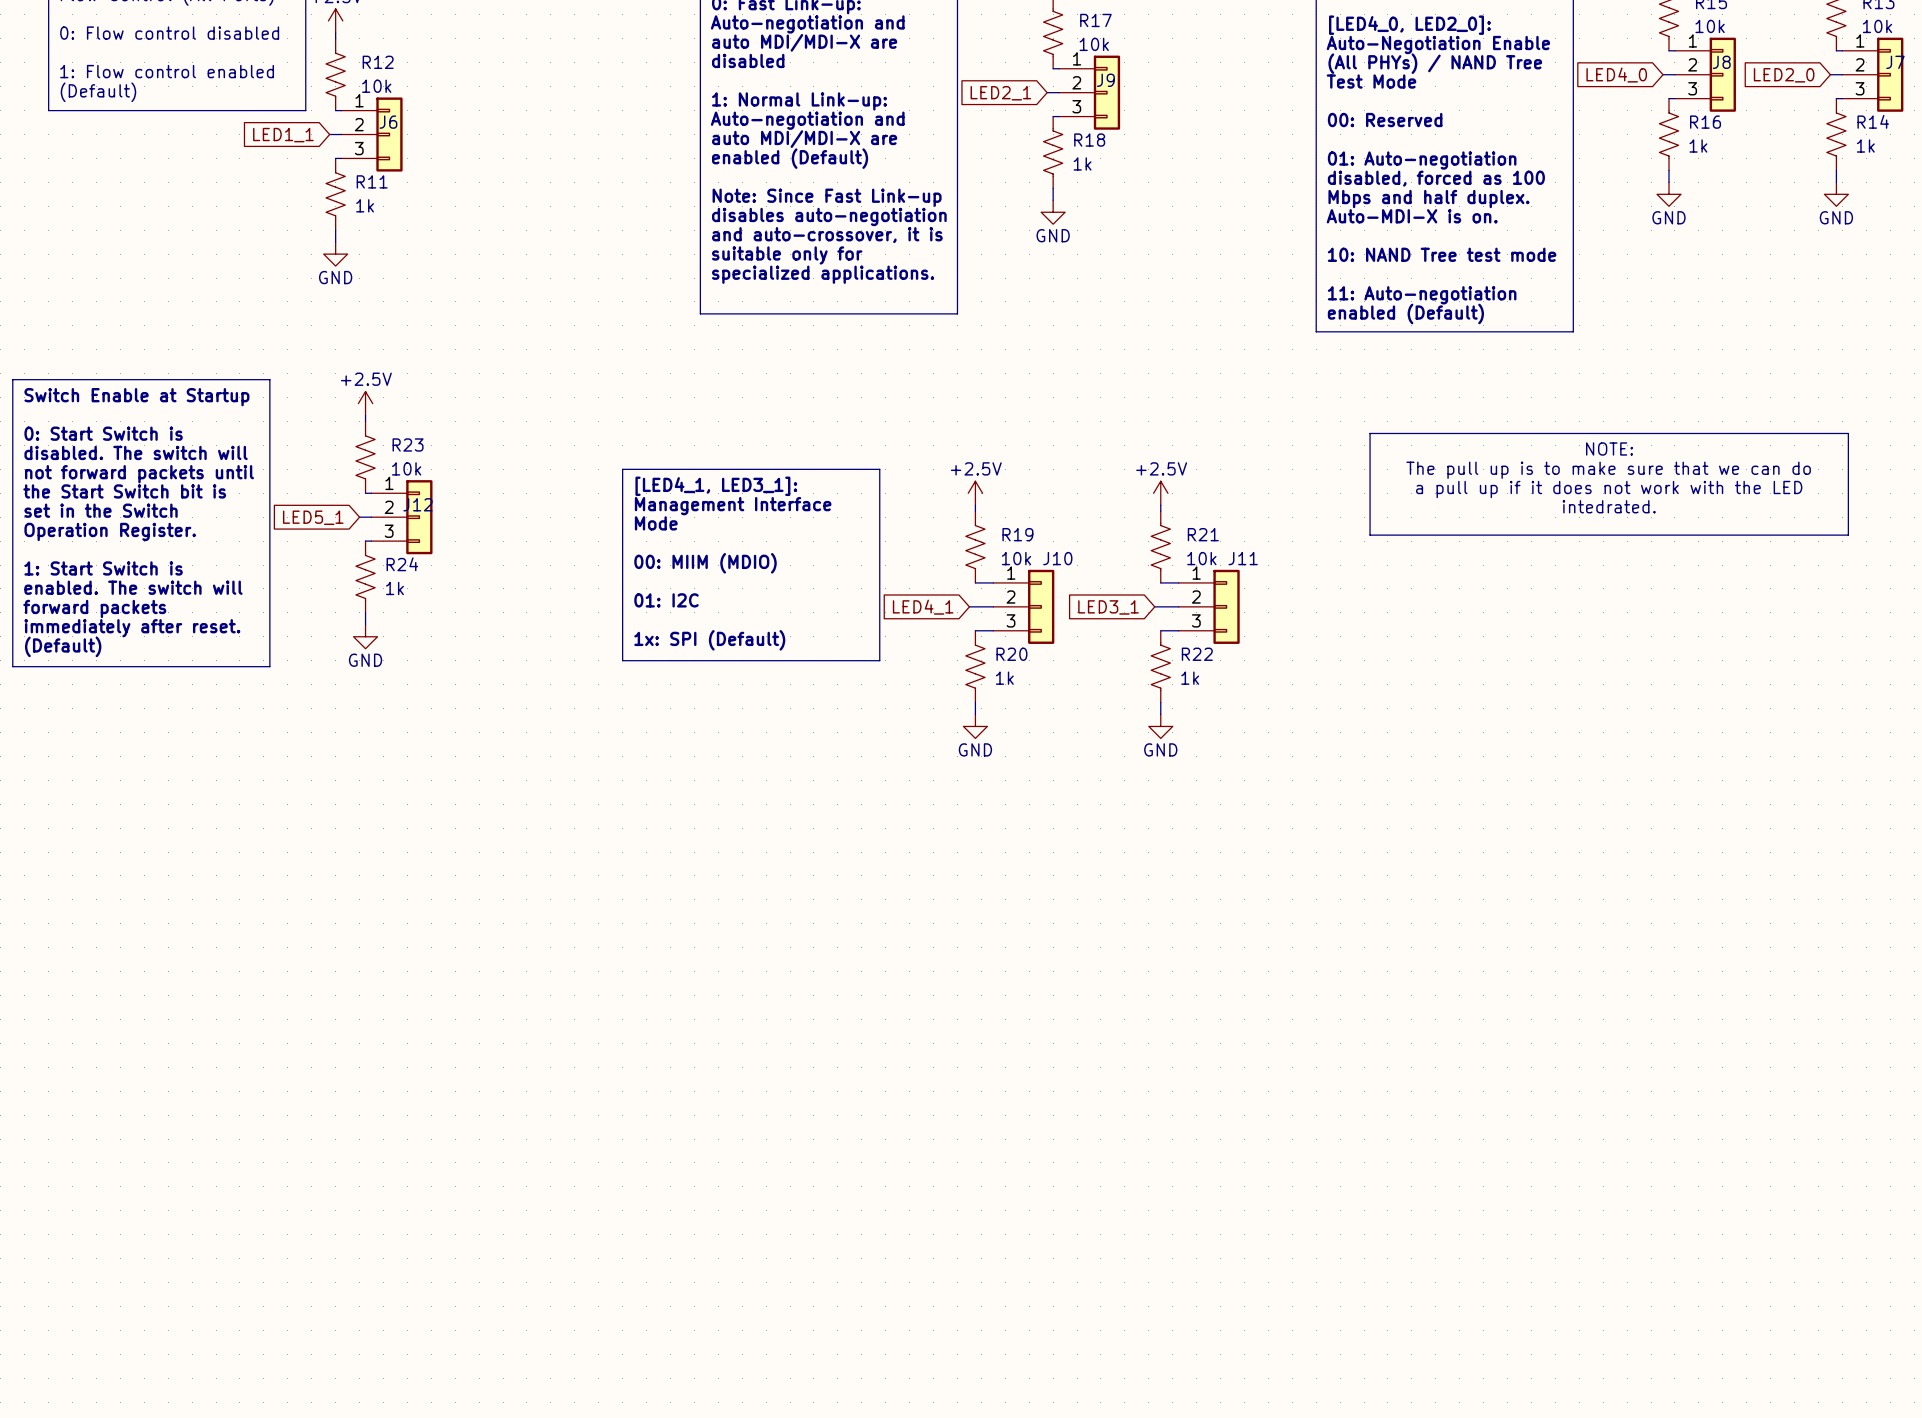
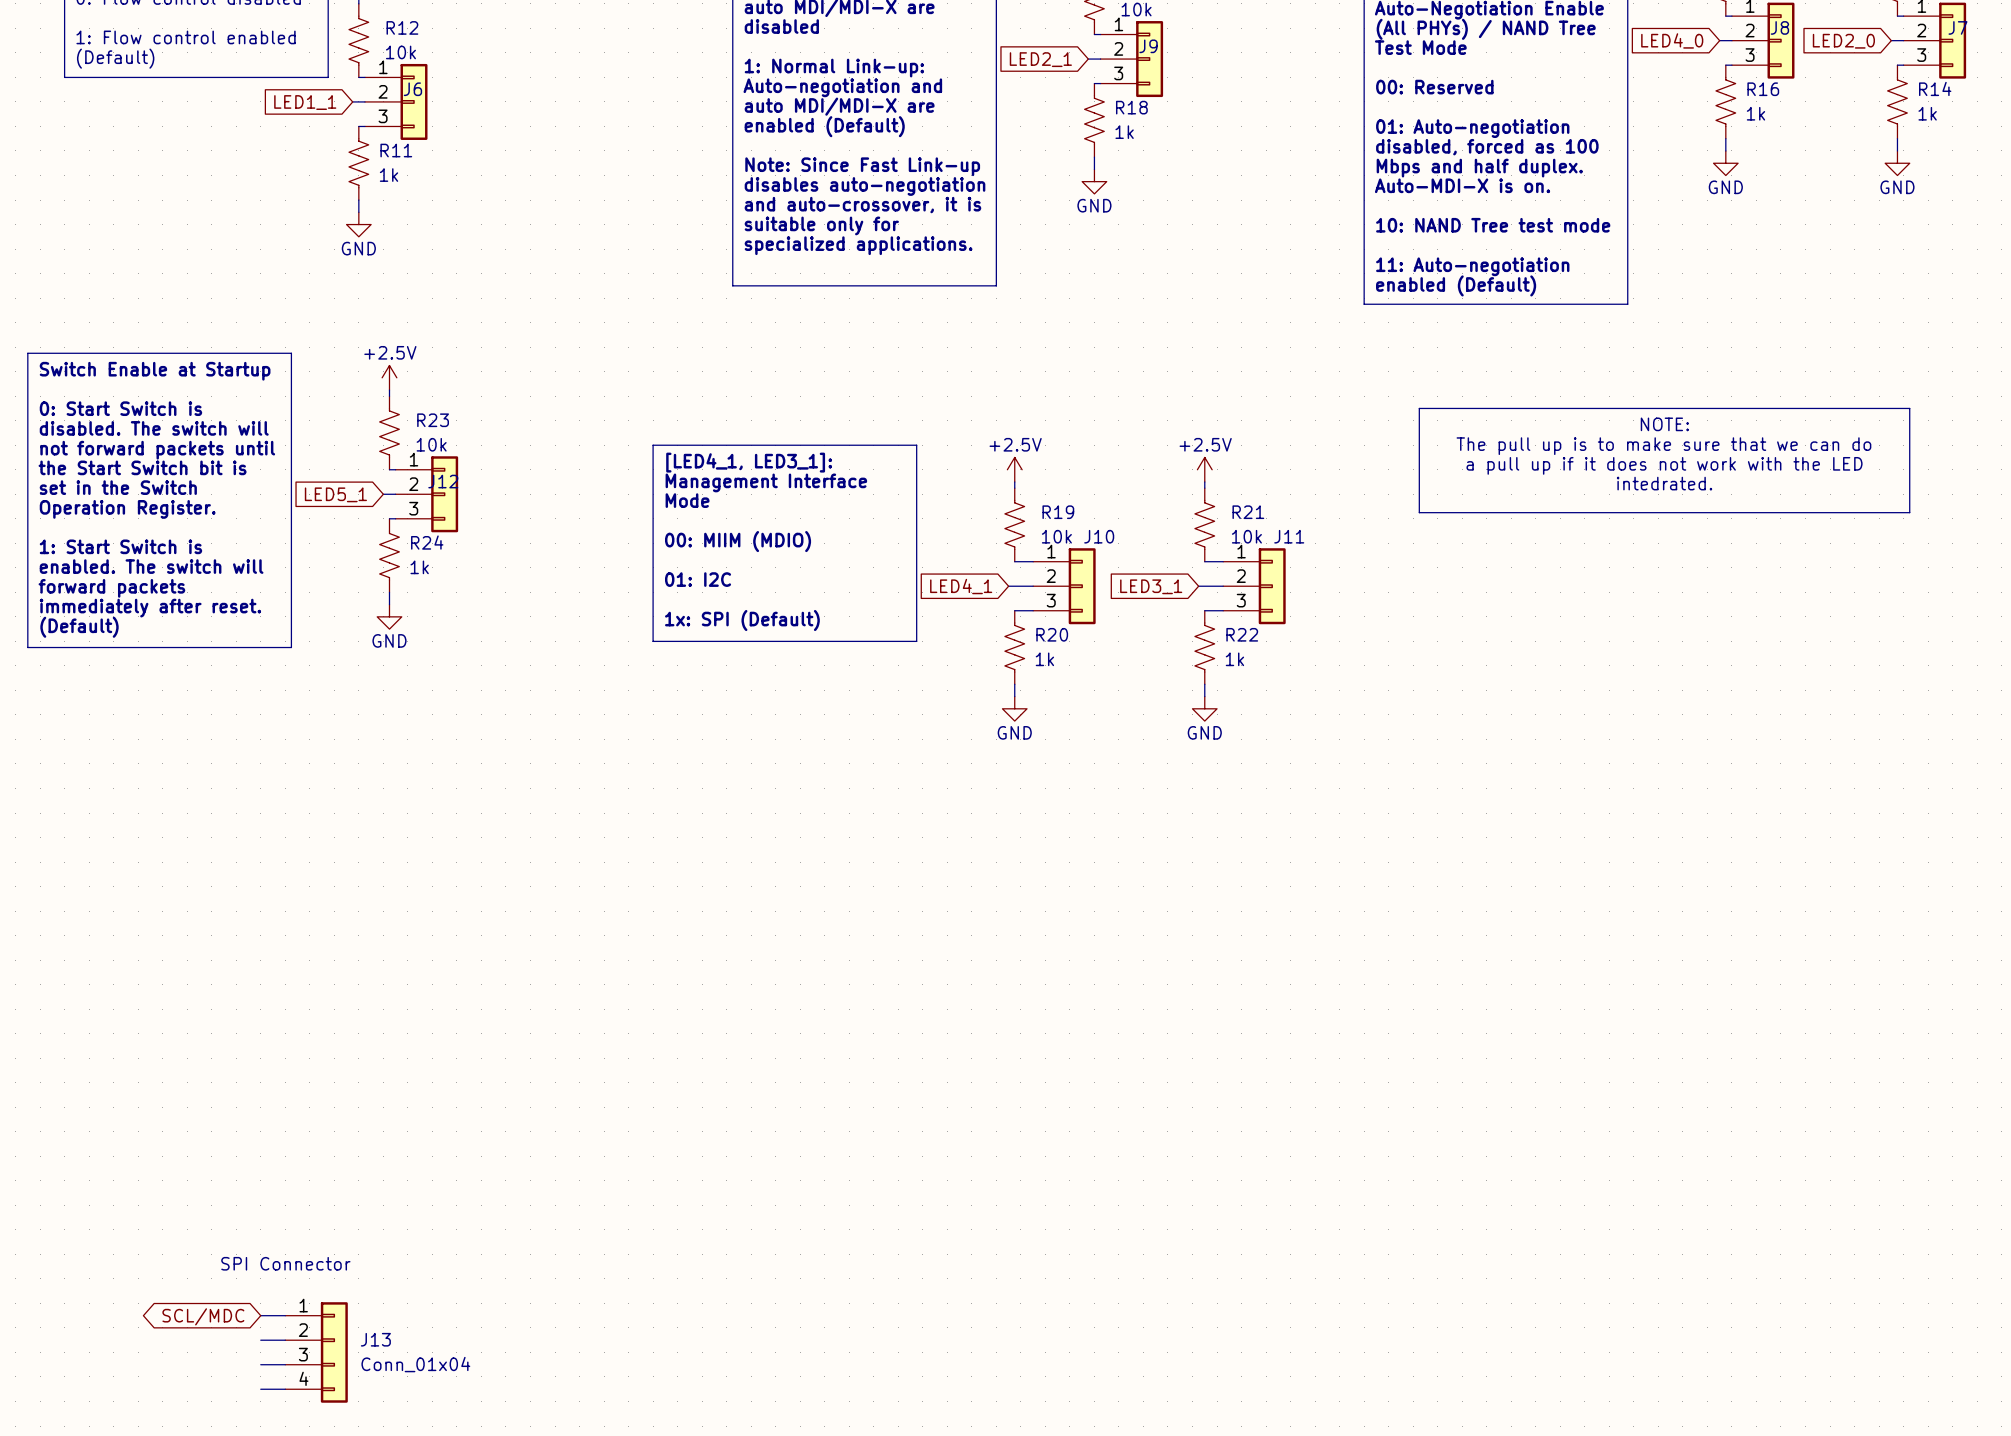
text: none -> SPI Connector (285, 1263)
wire: none -> (260, 1315) (285, 1315)
global label: none -> SCL/MDC (203, 1316)
wire: none -> (260, 1340) (285, 1340)
J13: none -> Conn_01x04 (316, 1352)
wire: none -> (260, 1364) (285, 1364)
wire: none -> (260, 1389) (285, 1389)

